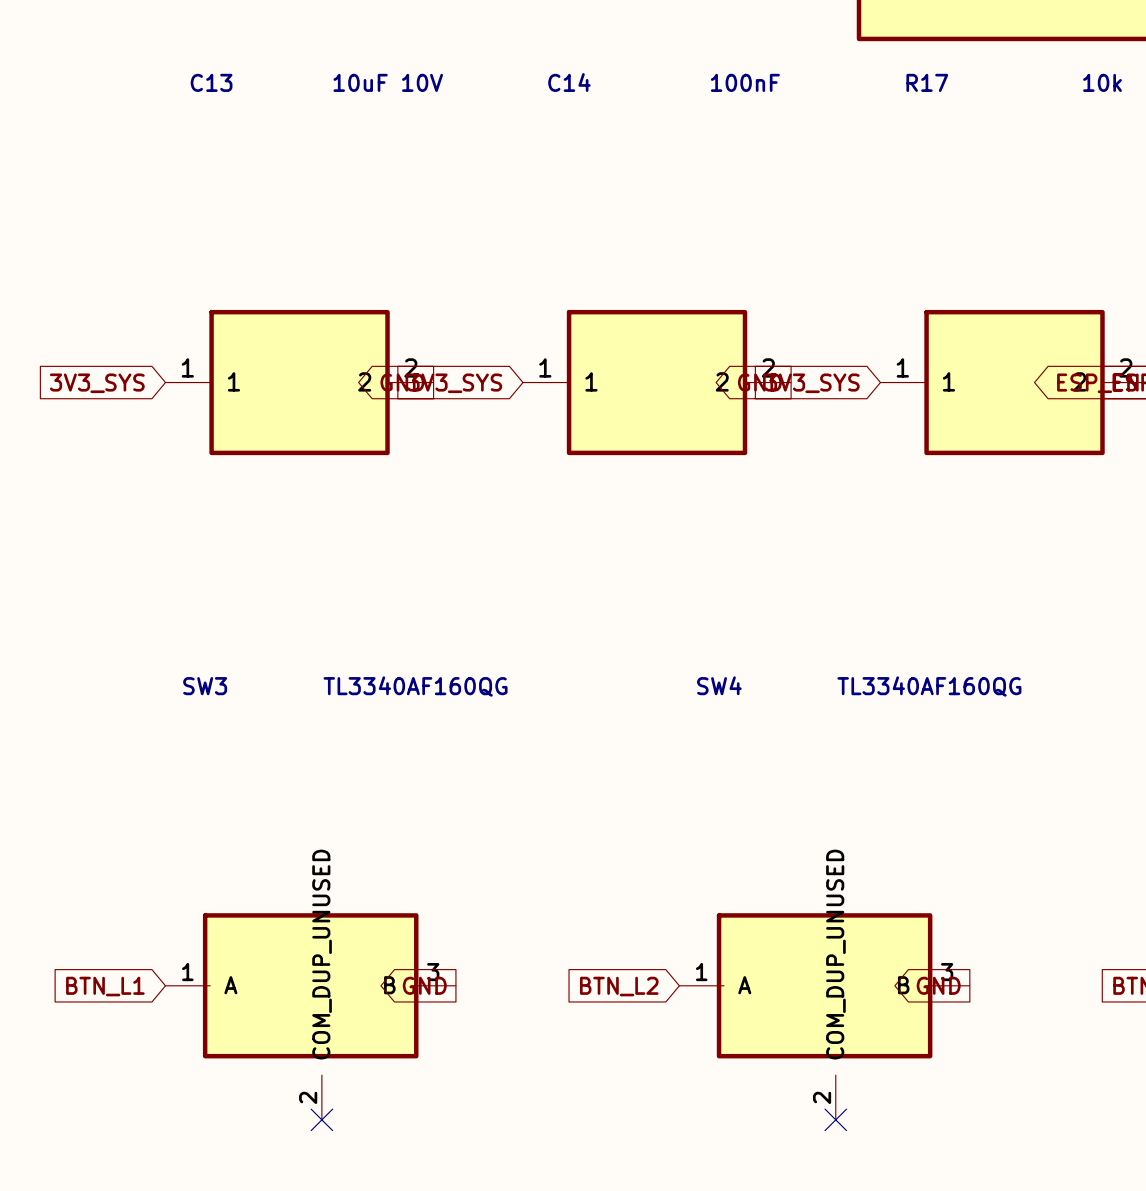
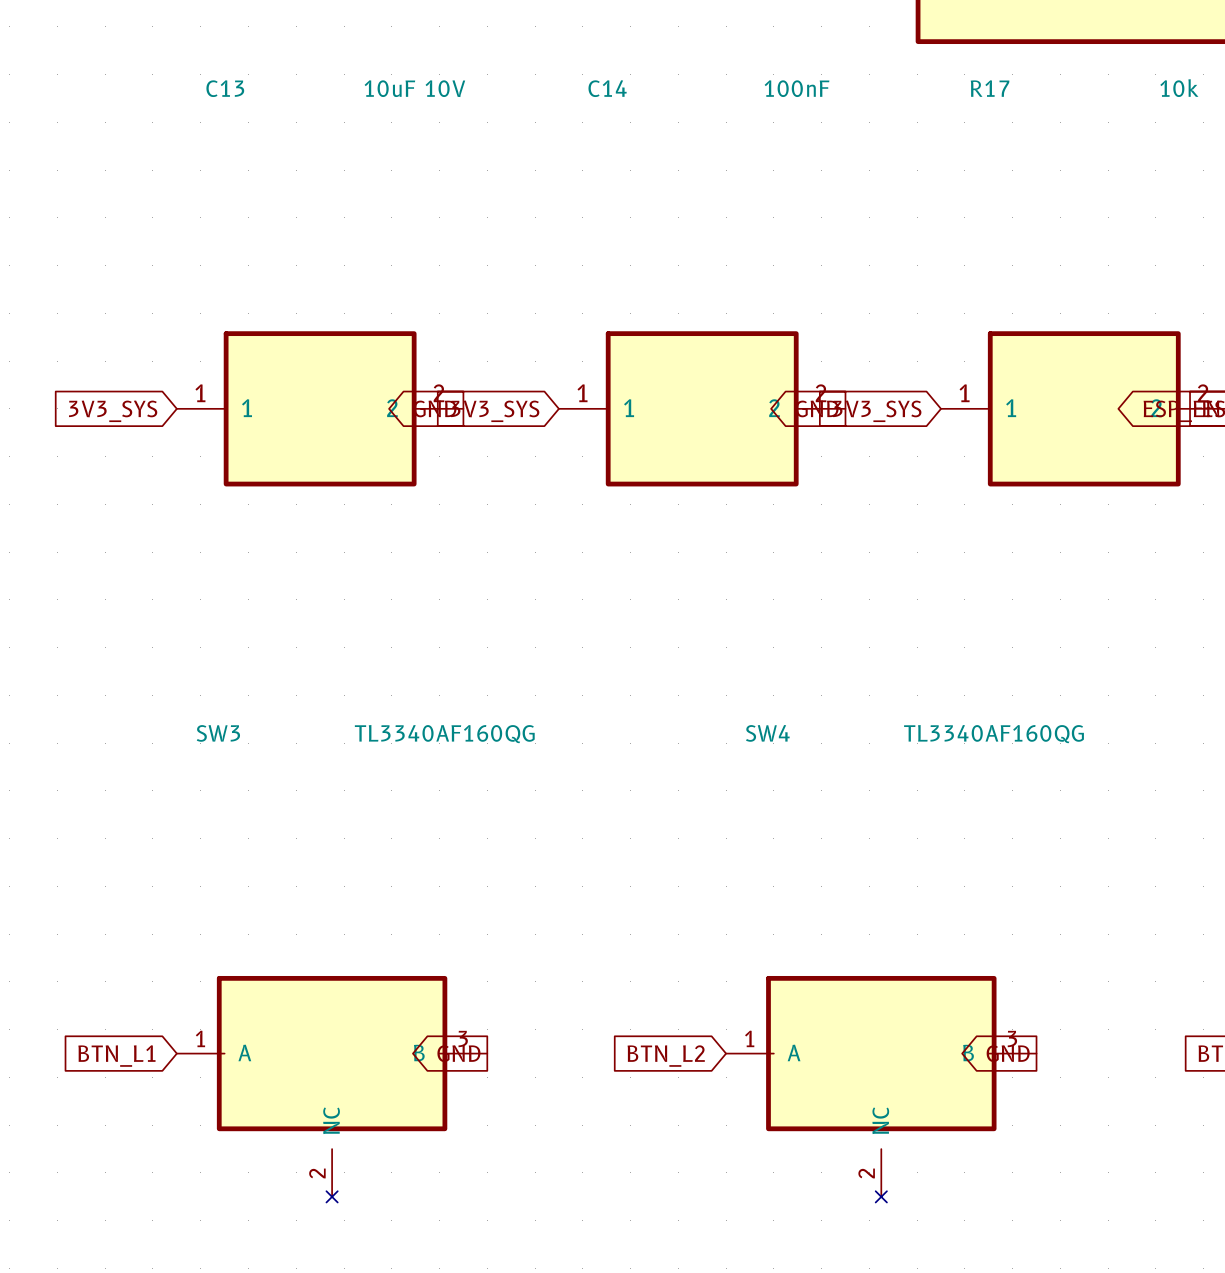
SW3 symbol: [165, 913, 456, 1120] -> [176, 975, 488, 1203]
SW4 symbol: [679, 913, 970, 1120] -> [726, 975, 1037, 1203]
no-connect mark: (321, 1119) -> none
no-connect mark: (835, 1119) -> none

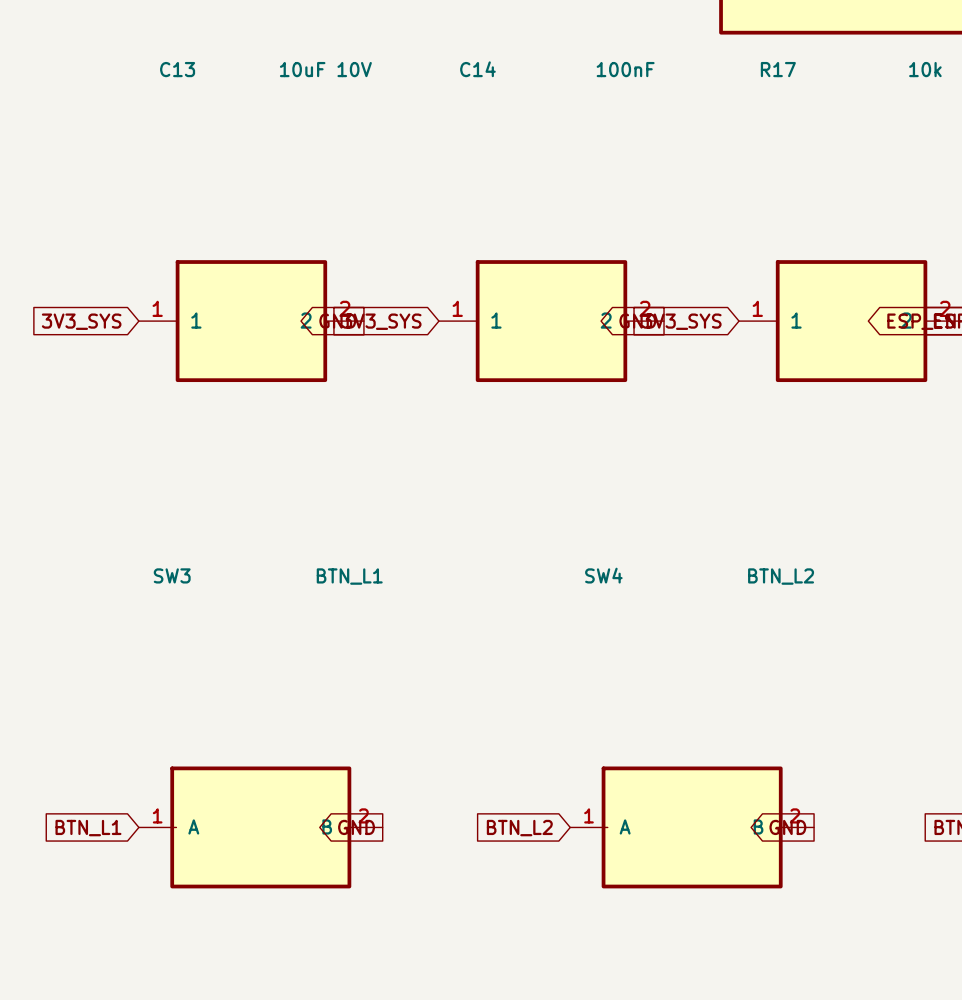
SW3 value: TL3340AF160QG (444, 734) -> BTN_L1 (349, 576)
SW4 value: TL3340AF160QG (994, 734) -> BTN_L2 (781, 576)
SW3 symbol: [176, 975, 488, 1203] -> [138, 766, 383, 889]
SW4 symbol: [726, 975, 1037, 1203] -> [570, 766, 815, 889]

